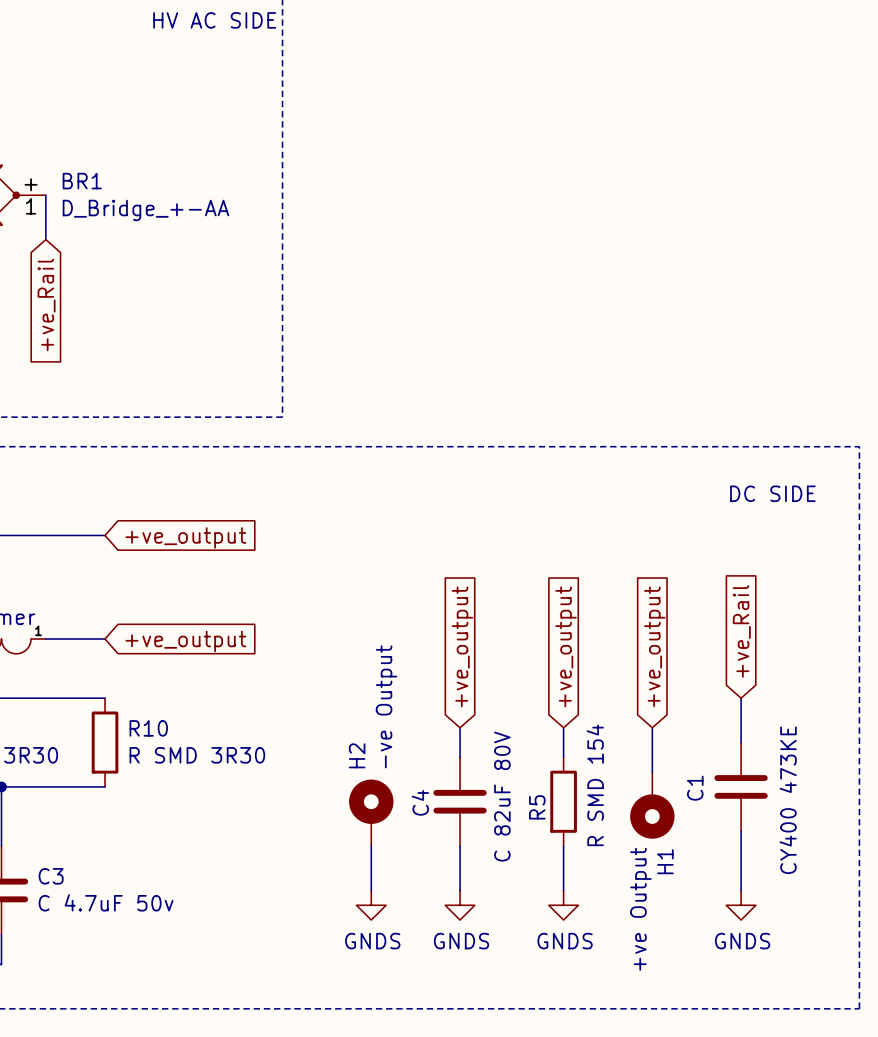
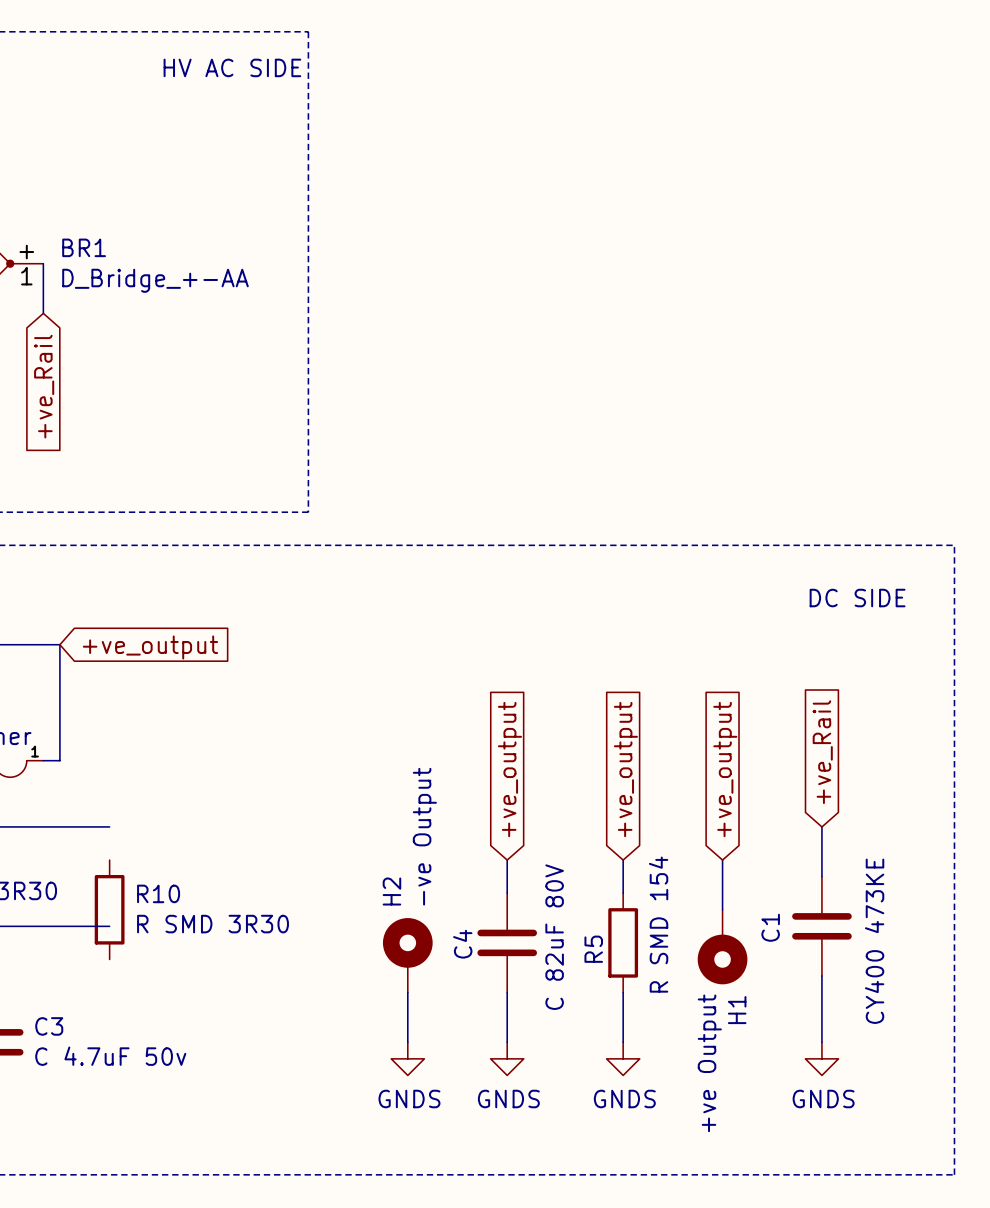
wire: (60, 535) (105, 535) -> (59, 644) (59, 760)
global label position: +ve_output (185, 537) -> +ve_output (150, 647)
wire: (60, 639) (105, 639) -> none
global label: +ve_output (185, 641) -> none
R10 position: (105, 742) -> (109, 909)

